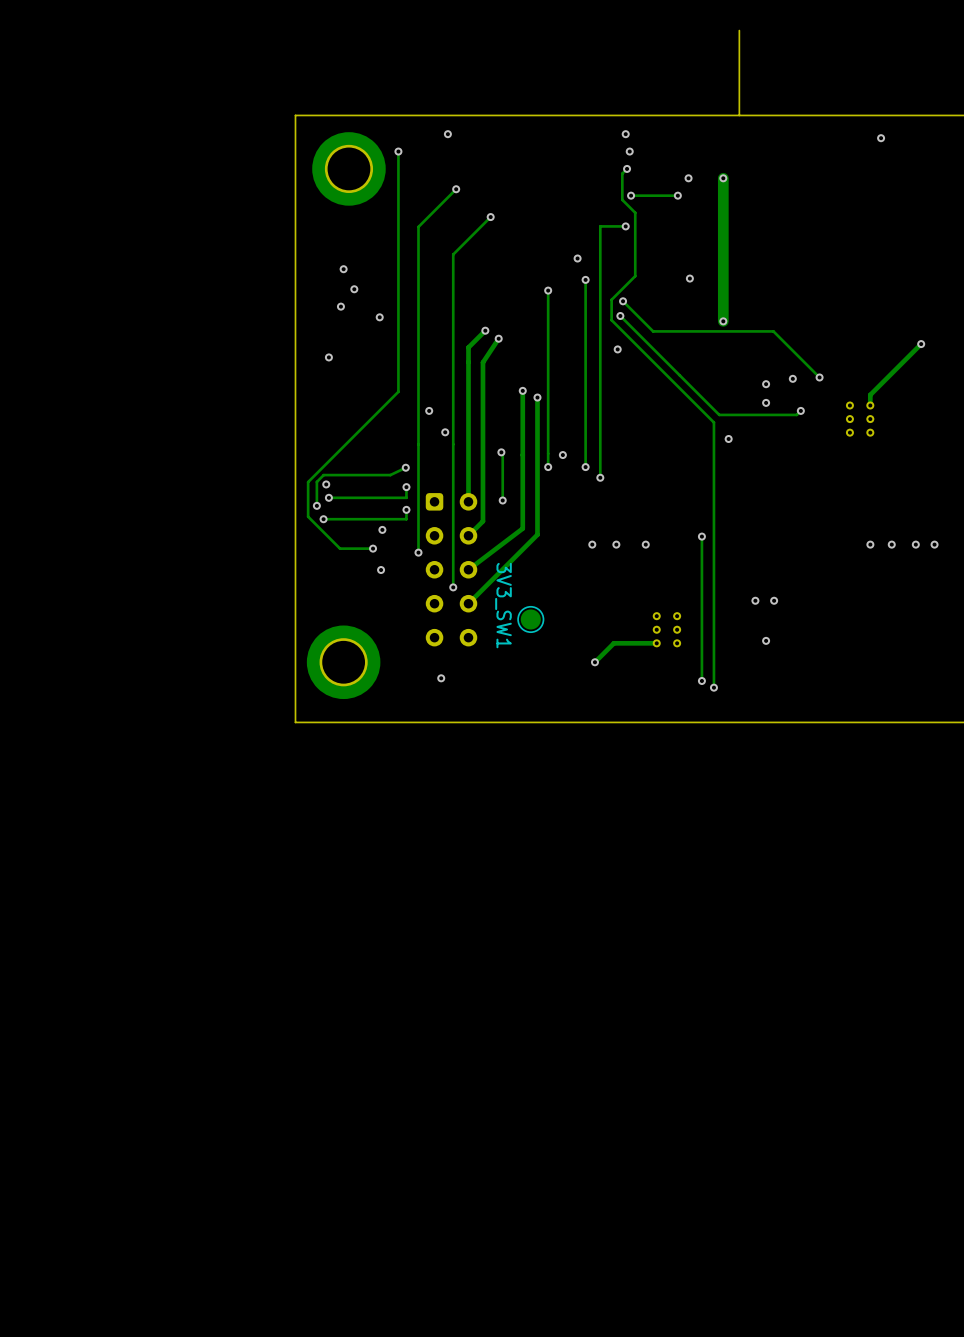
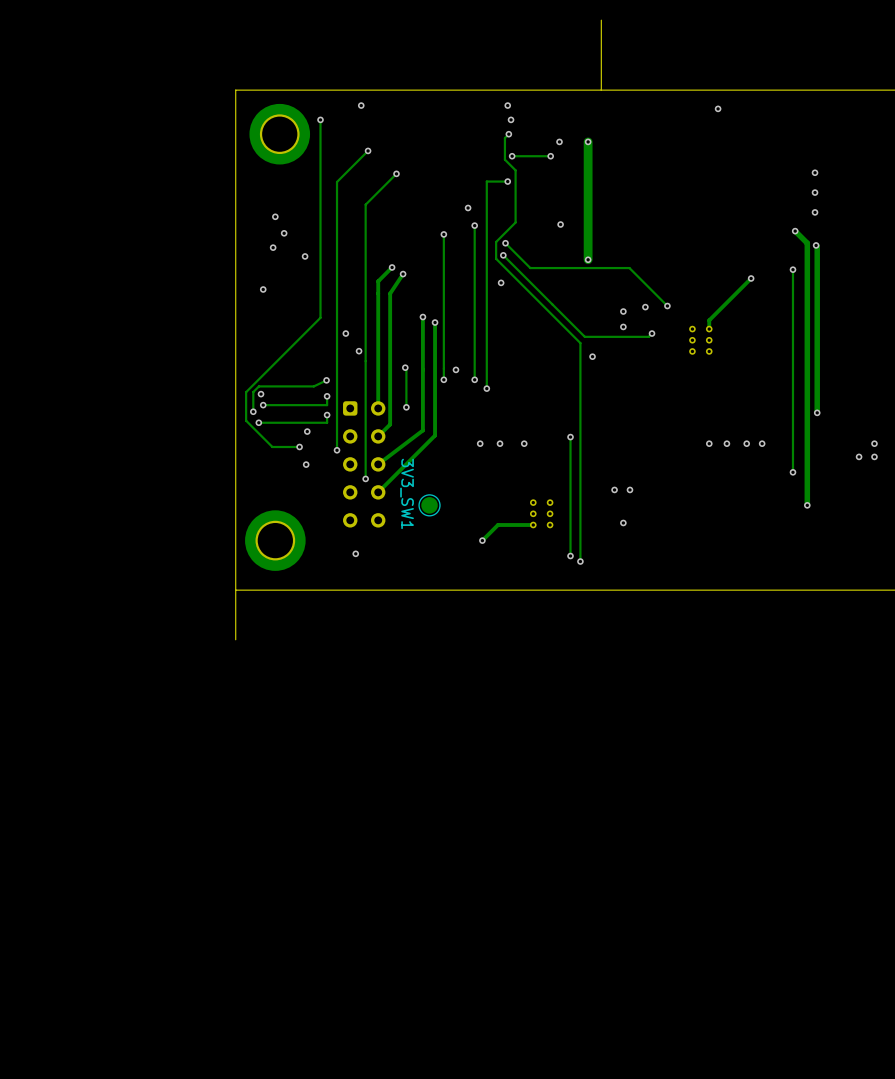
board edge: none -> (235, 590) (235, 639)

